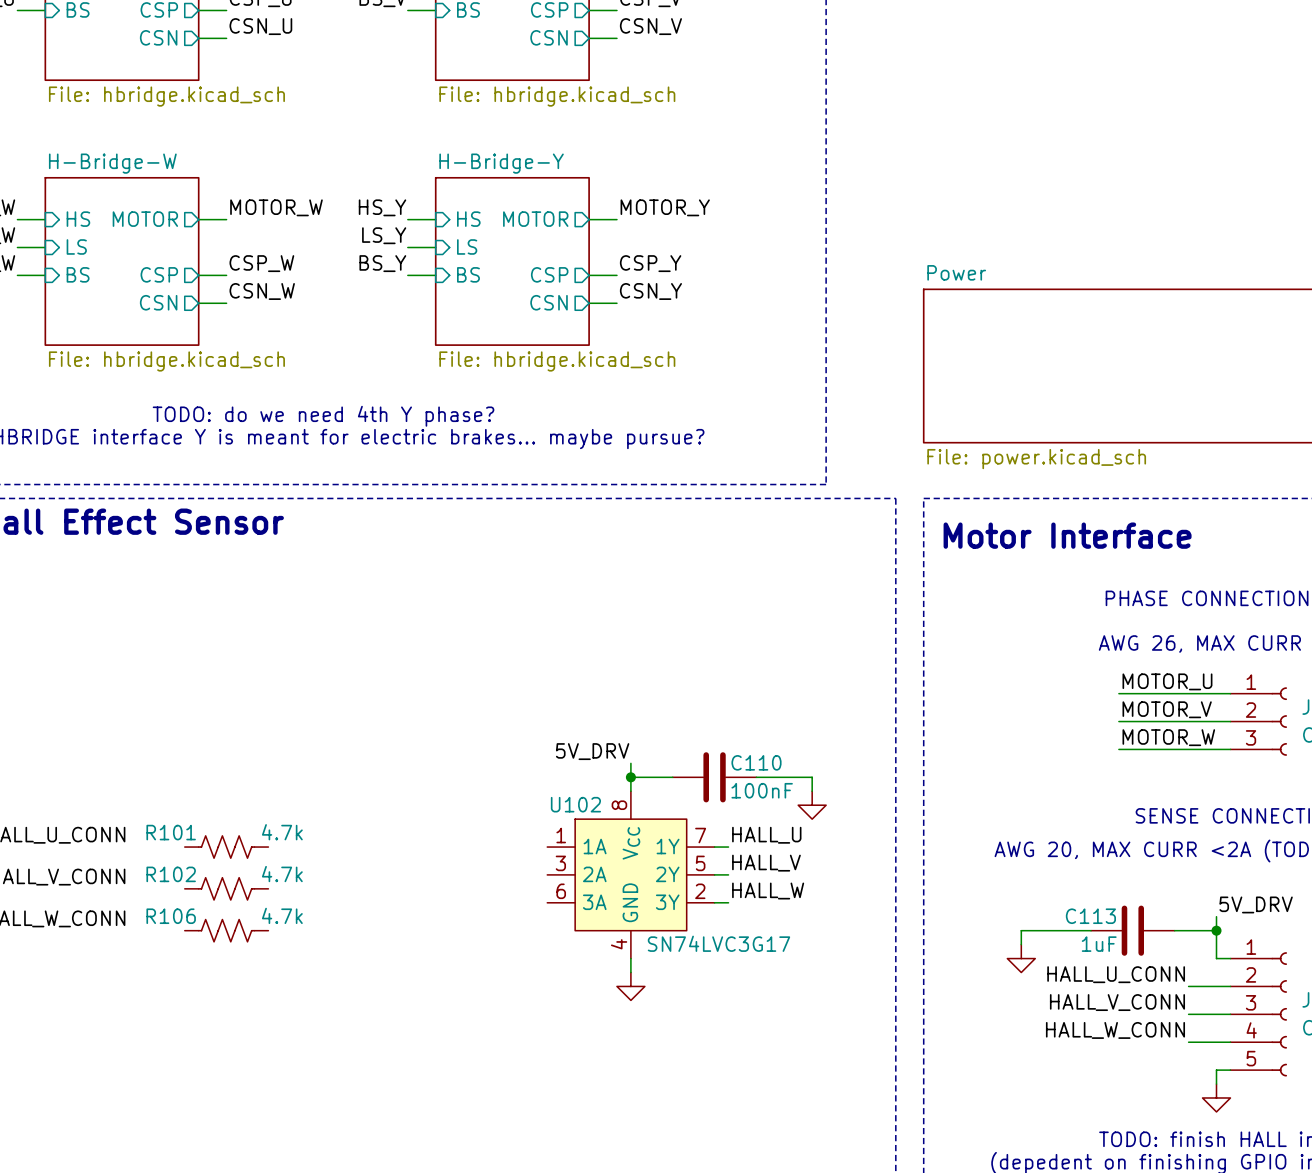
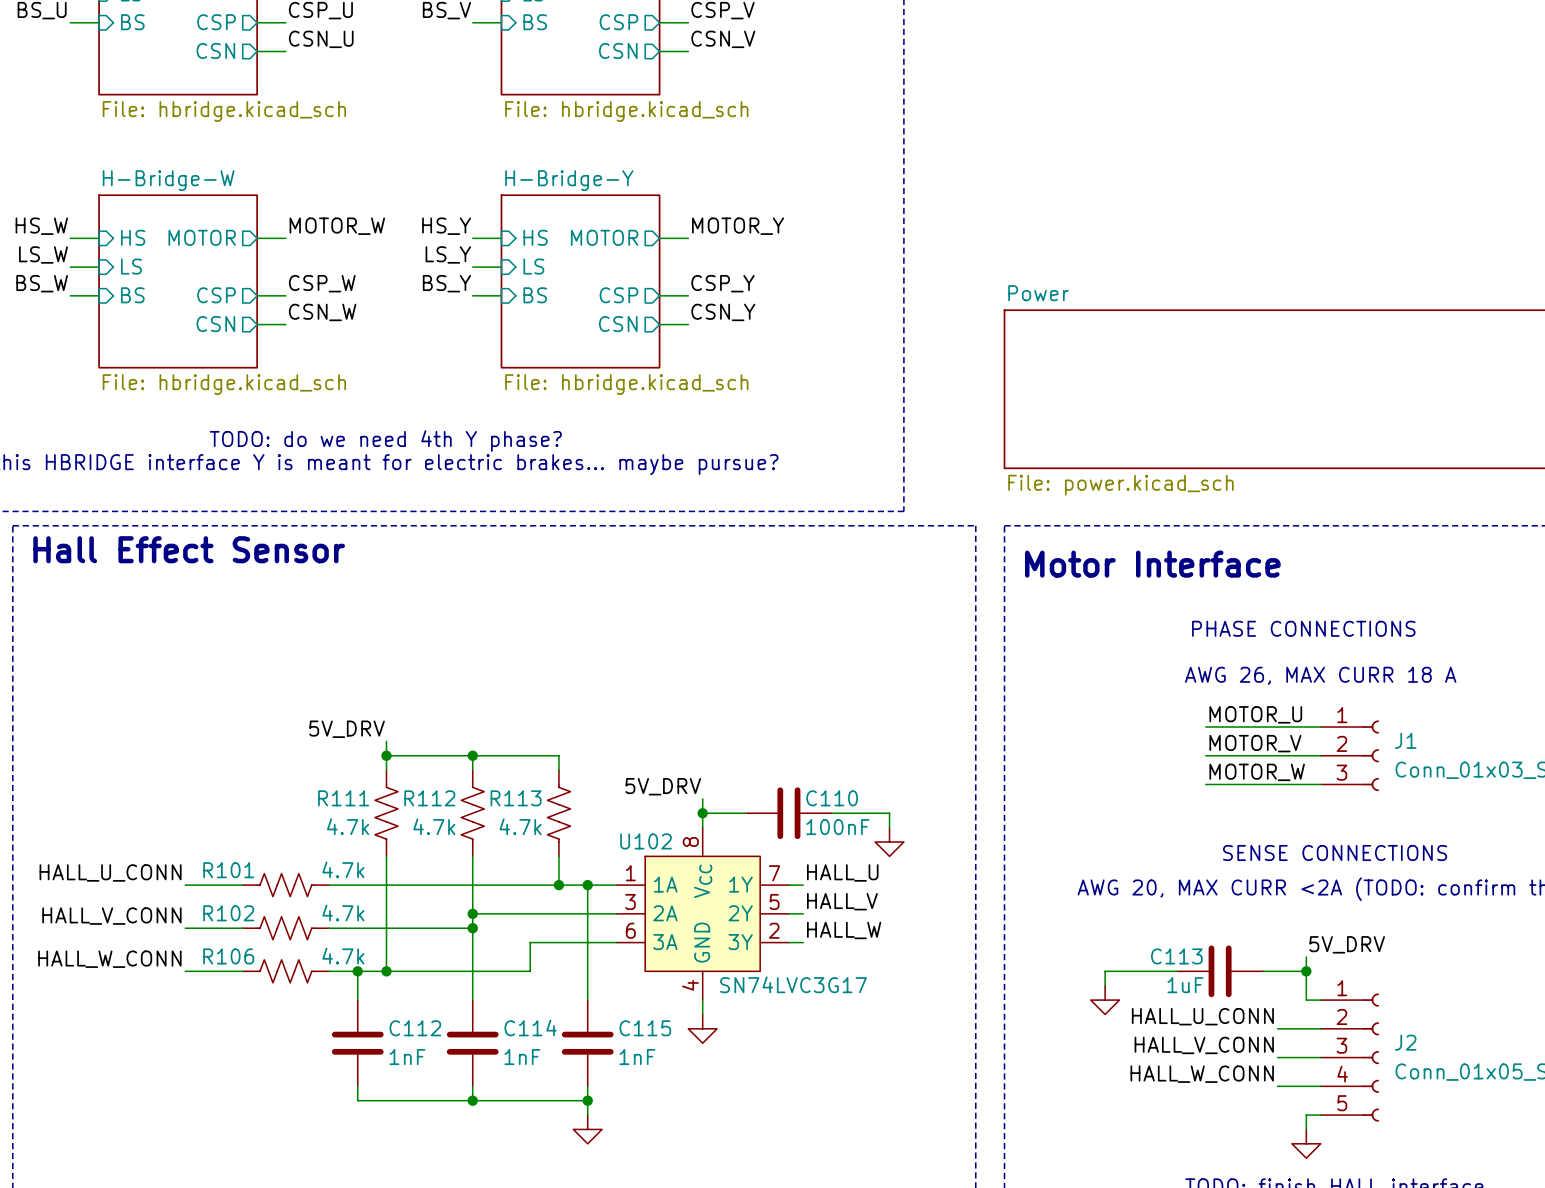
label: none -> 5V_DRV (347, 729)
wire: none -> (386, 741) (386, 770)
wire: none -> (386, 755) (558, 755) (558, 770)
junction: none -> (386, 755)
wire: none -> (472, 755) (472, 770)
junction: none -> (472, 755)
R111: none -> 4.7k (386, 813)
R112: none -> 4.7k (472, 813)
R113: none -> 4.7k (558, 813)
wire: none -> (386, 856) (386, 971)
wire: none -> (472, 856) (472, 1000)
wire: none -> (558, 856) (558, 885)
wire: none -> (185, 885) (242, 885)
wire: none -> (329, 885) (616, 885)
junction: none -> (558, 885)
wire: none -> (587, 885) (587, 1000)
junction: none -> (587, 885)
wire: none -> (472, 913) (616, 913)
junction: none -> (472, 913)
wire: none -> (185, 928) (242, 928)
wire: none -> (329, 928) (472, 928)
junction: none -> (472, 928)
wire: none -> (616, 942) (530, 942) (530, 971) (329, 971)
wire: none -> (185, 971) (242, 971)
wire: none -> (357, 971) (357, 1000)
junction: none -> (357, 971)
junction: none -> (386, 971)
C112: none -> 1nF (357, 1043)
C114: none -> 1nF (472, 1043)
C115: none -> 1nF (587, 1043)
wire: none -> (357, 1086) (357, 1100) (587, 1100)
wire: none -> (472, 1086) (472, 1100)
wire: none -> (587, 1086) (587, 1115)
junction: none -> (472, 1100)
junction: none -> (587, 1100)
power symbol: none -> (587, 1129)

